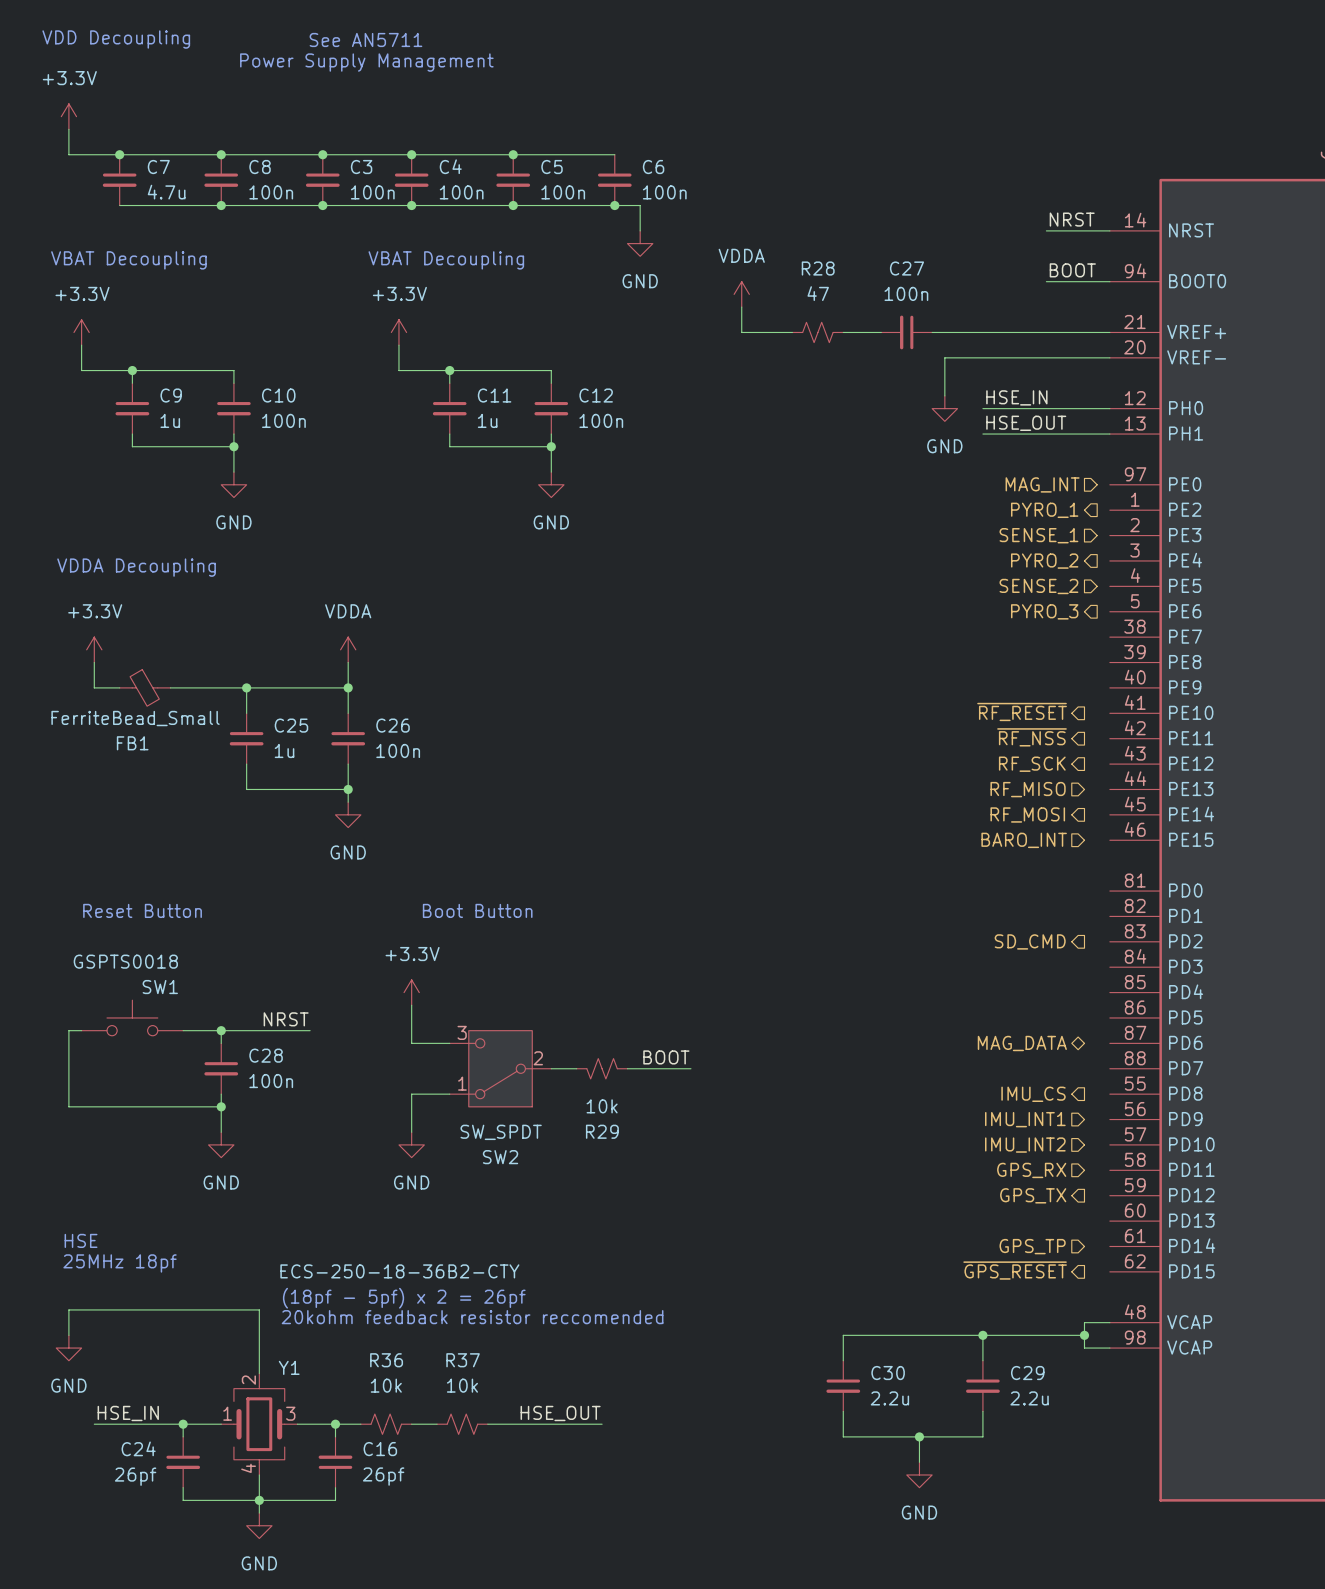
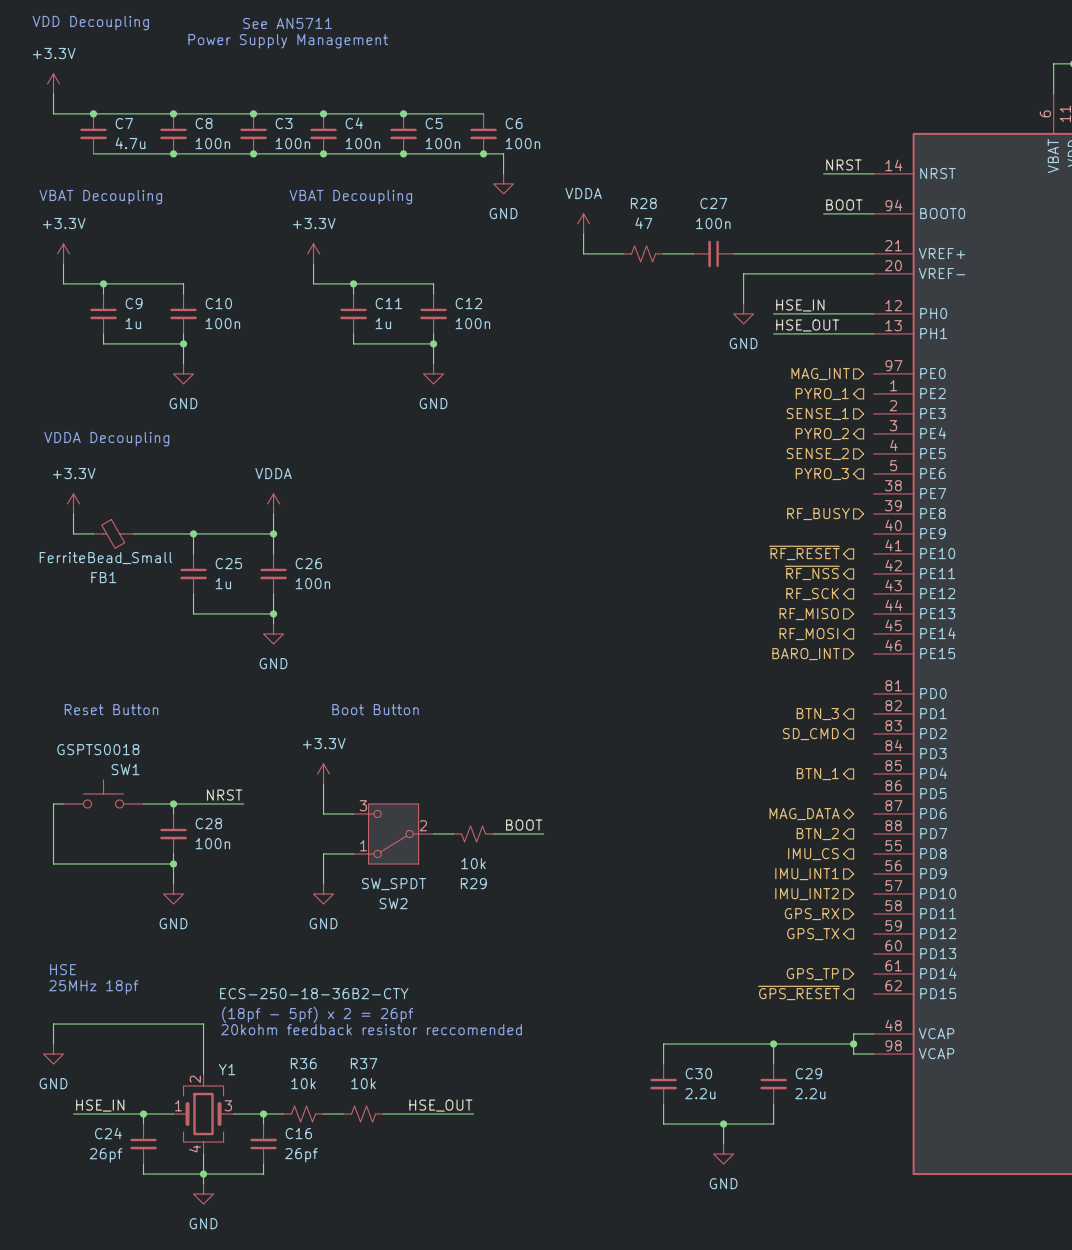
hierarchical label: none -> RF_BUSY (818, 514)
hierarchical label: none -> BTN_3 (817, 714)
hierarchical label: none -> BTN_1 (817, 774)
hierarchical label: none -> BTN_2 (817, 834)

